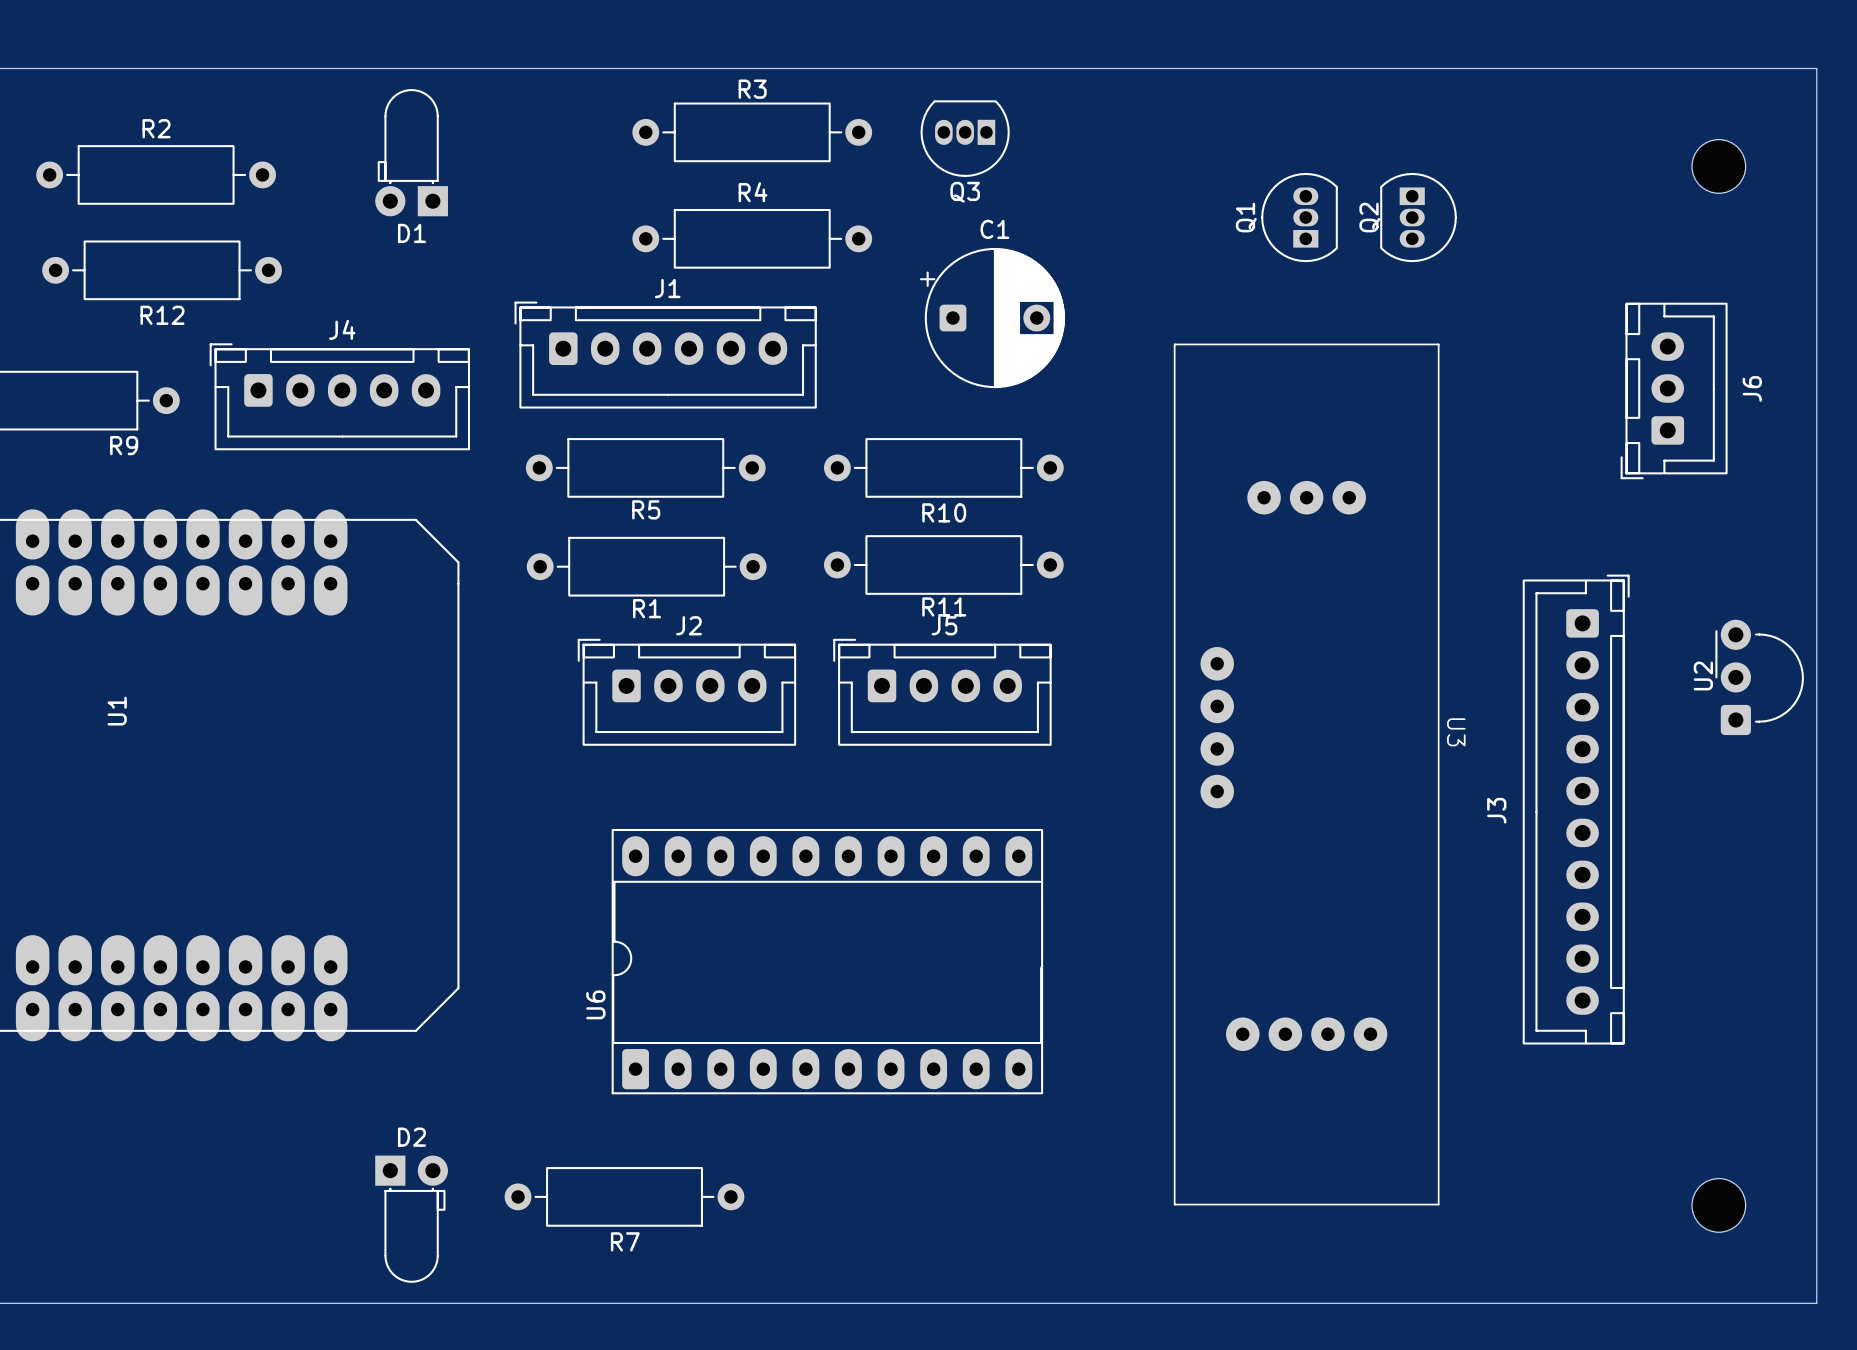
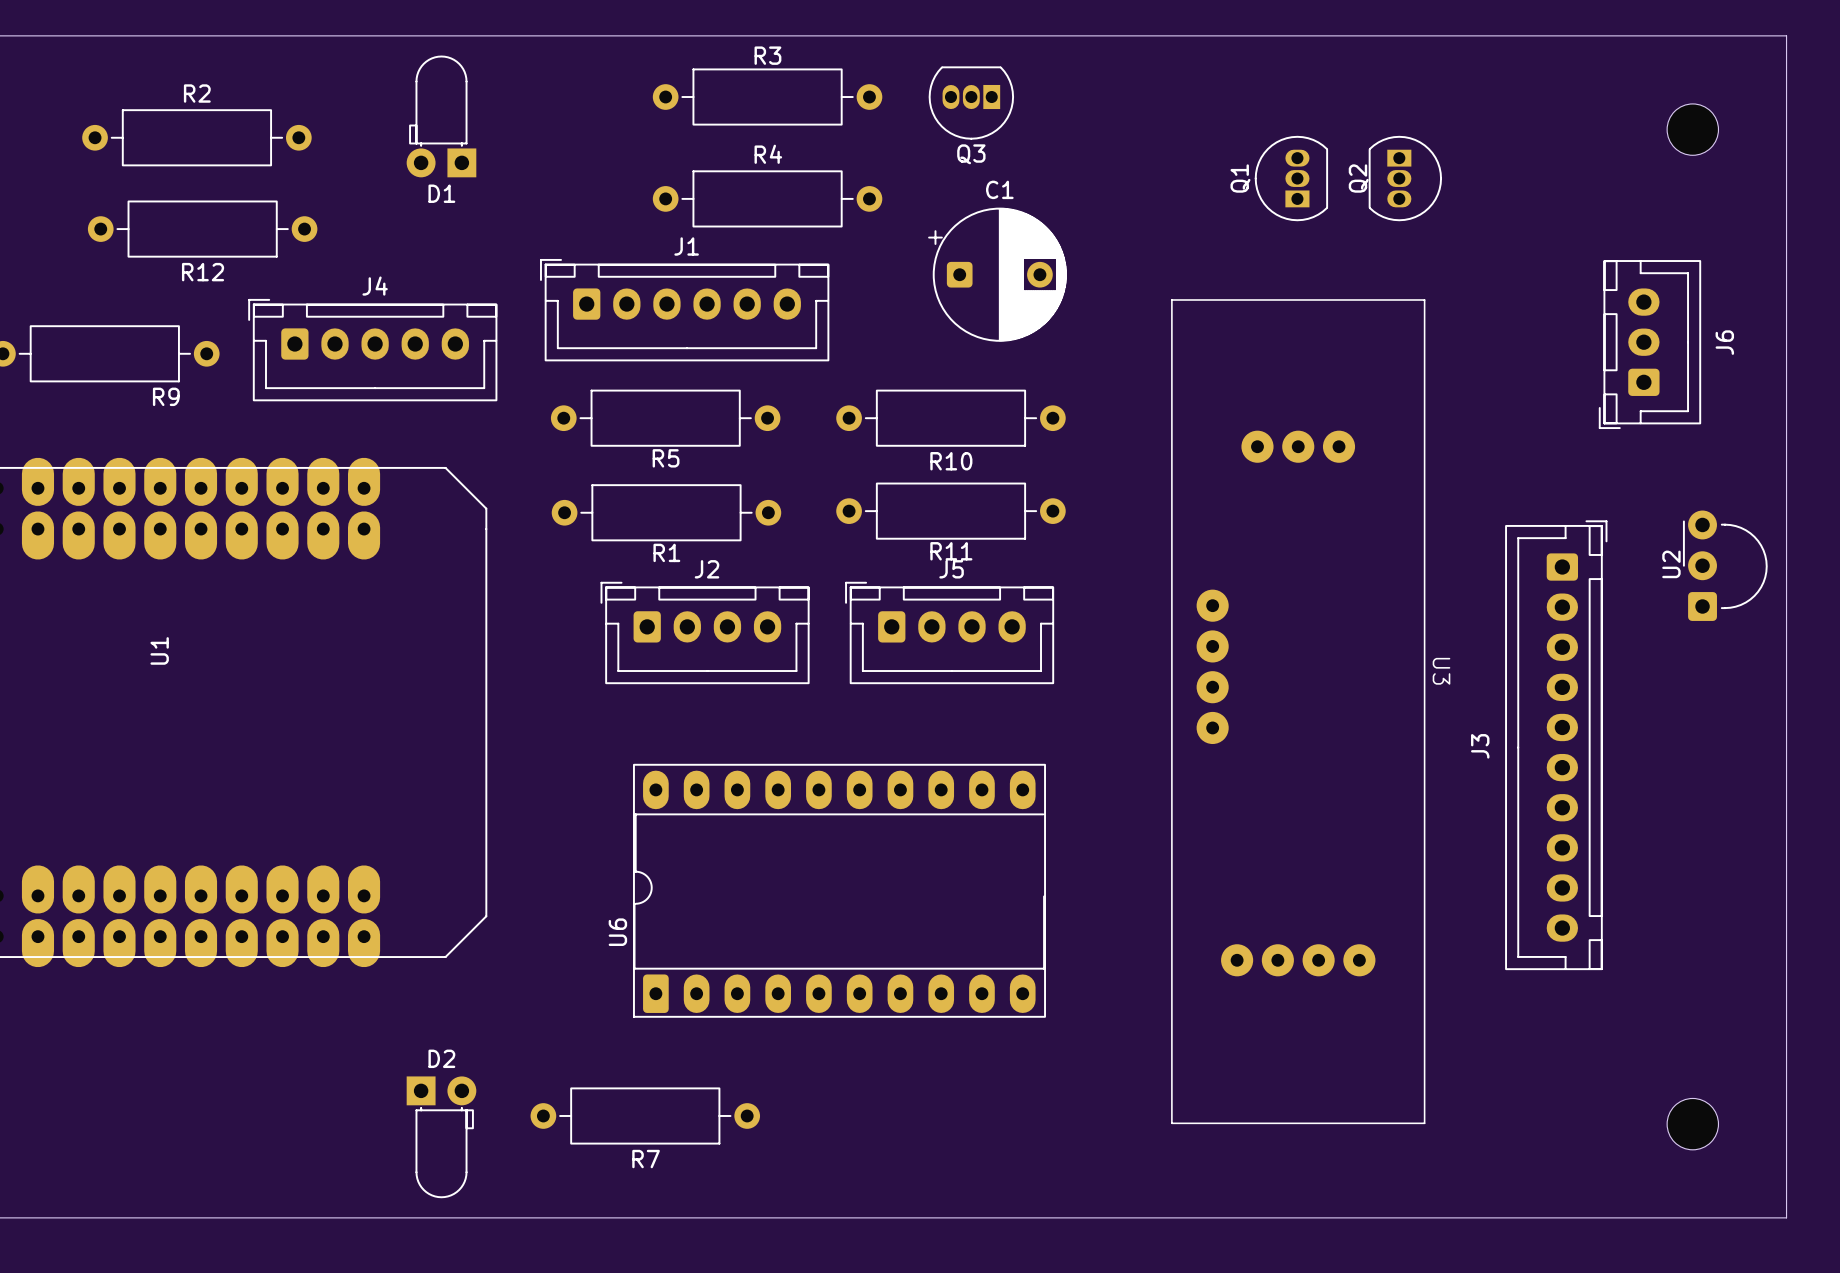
U2 position: (1759, 677) -> (1725, 565)

